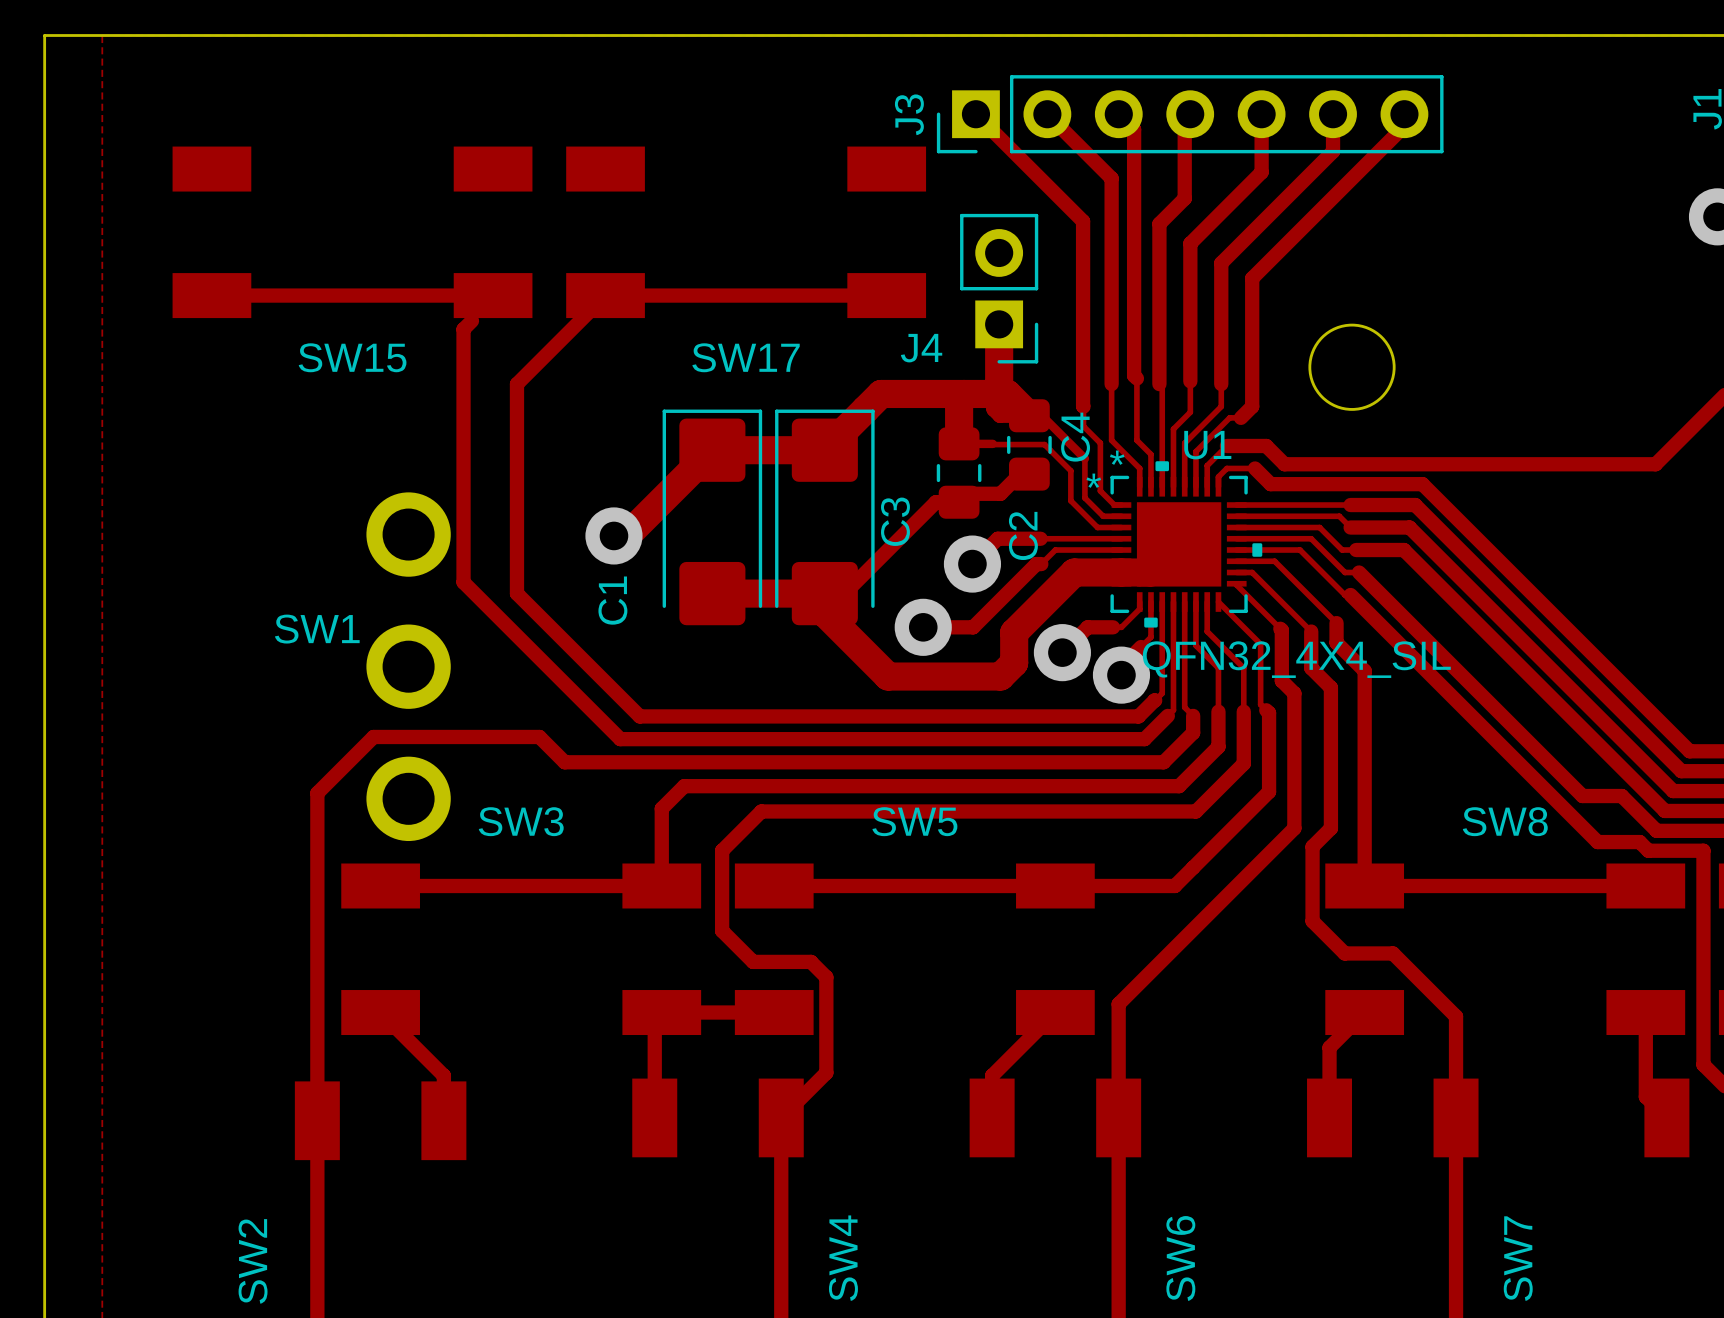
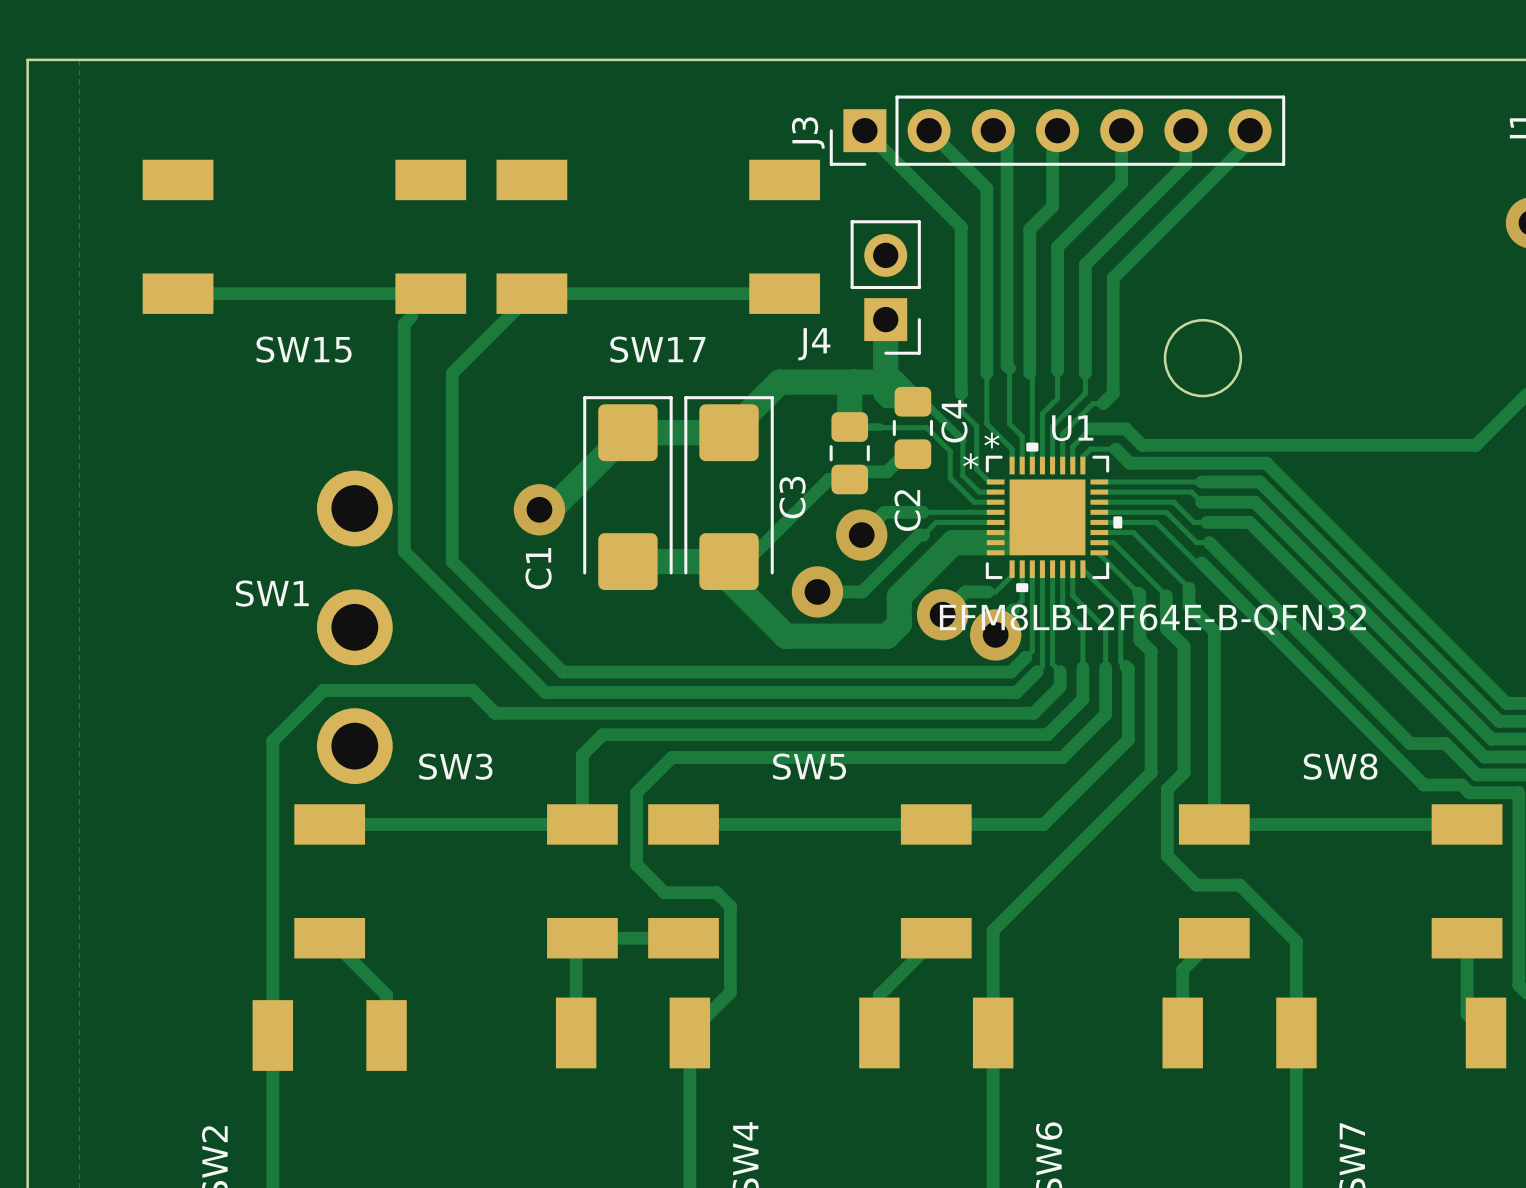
U1 value: QFN32_4X4_SIL (1296, 659) -> EFM8LB12F64E-B-QFN32 (1152, 619)

